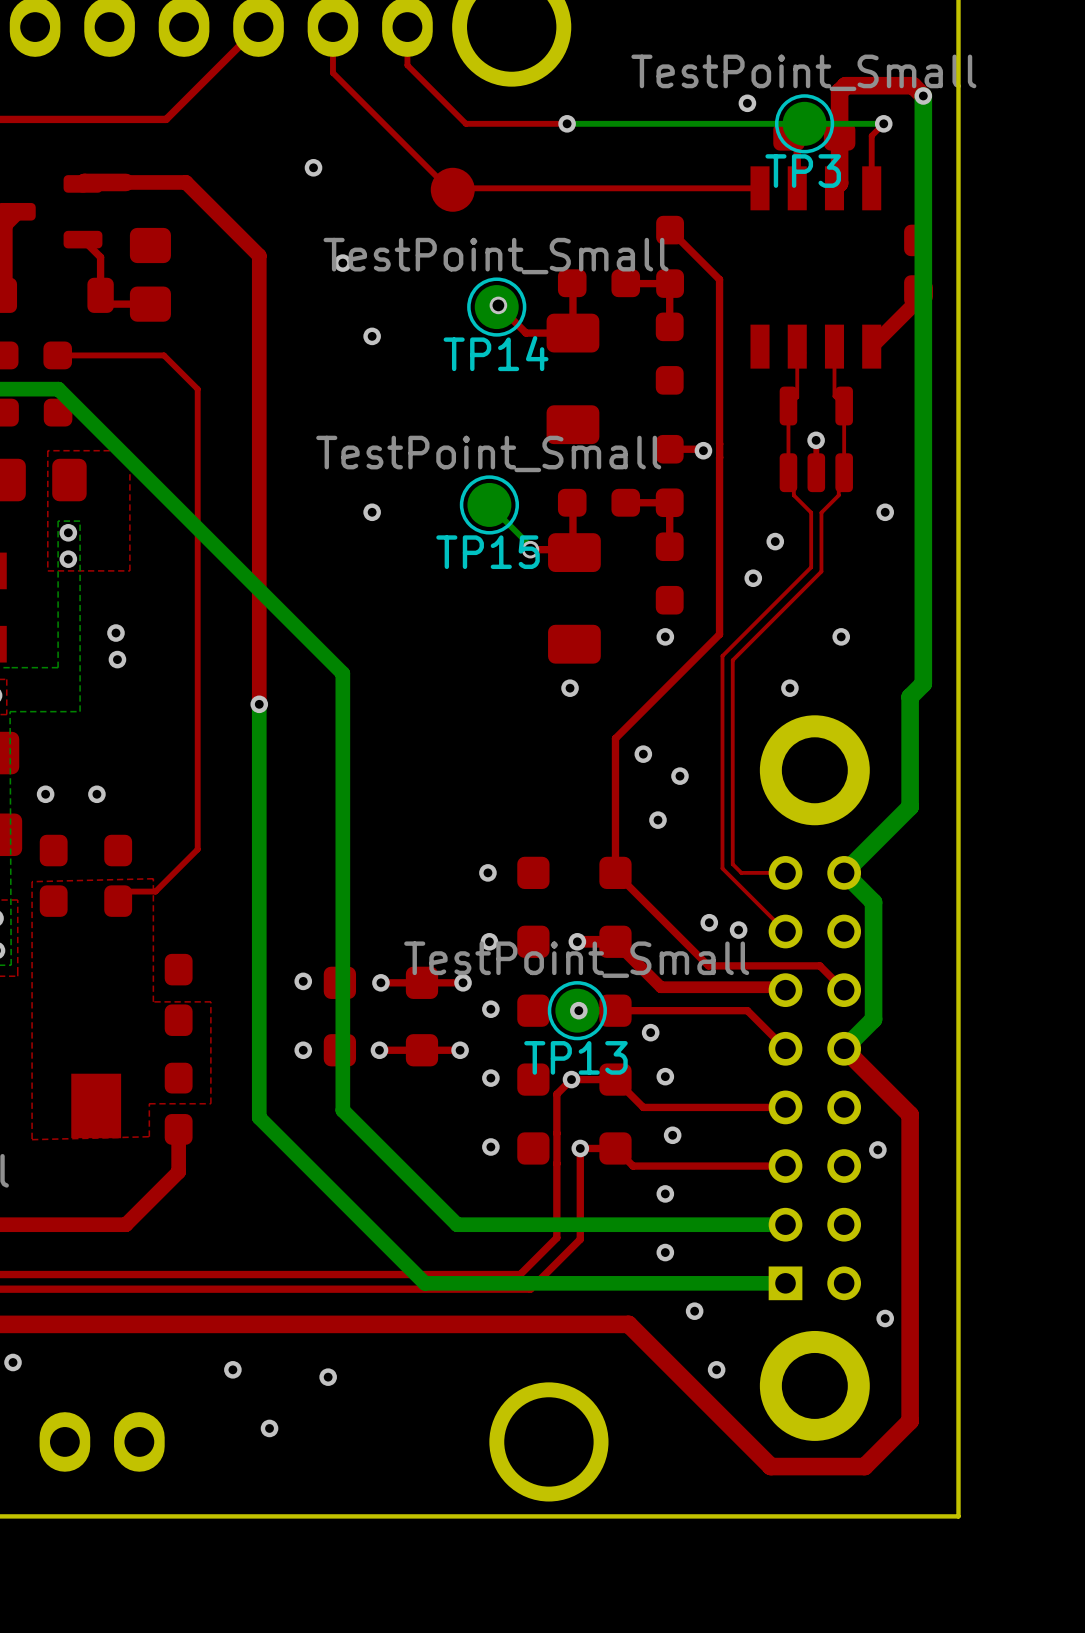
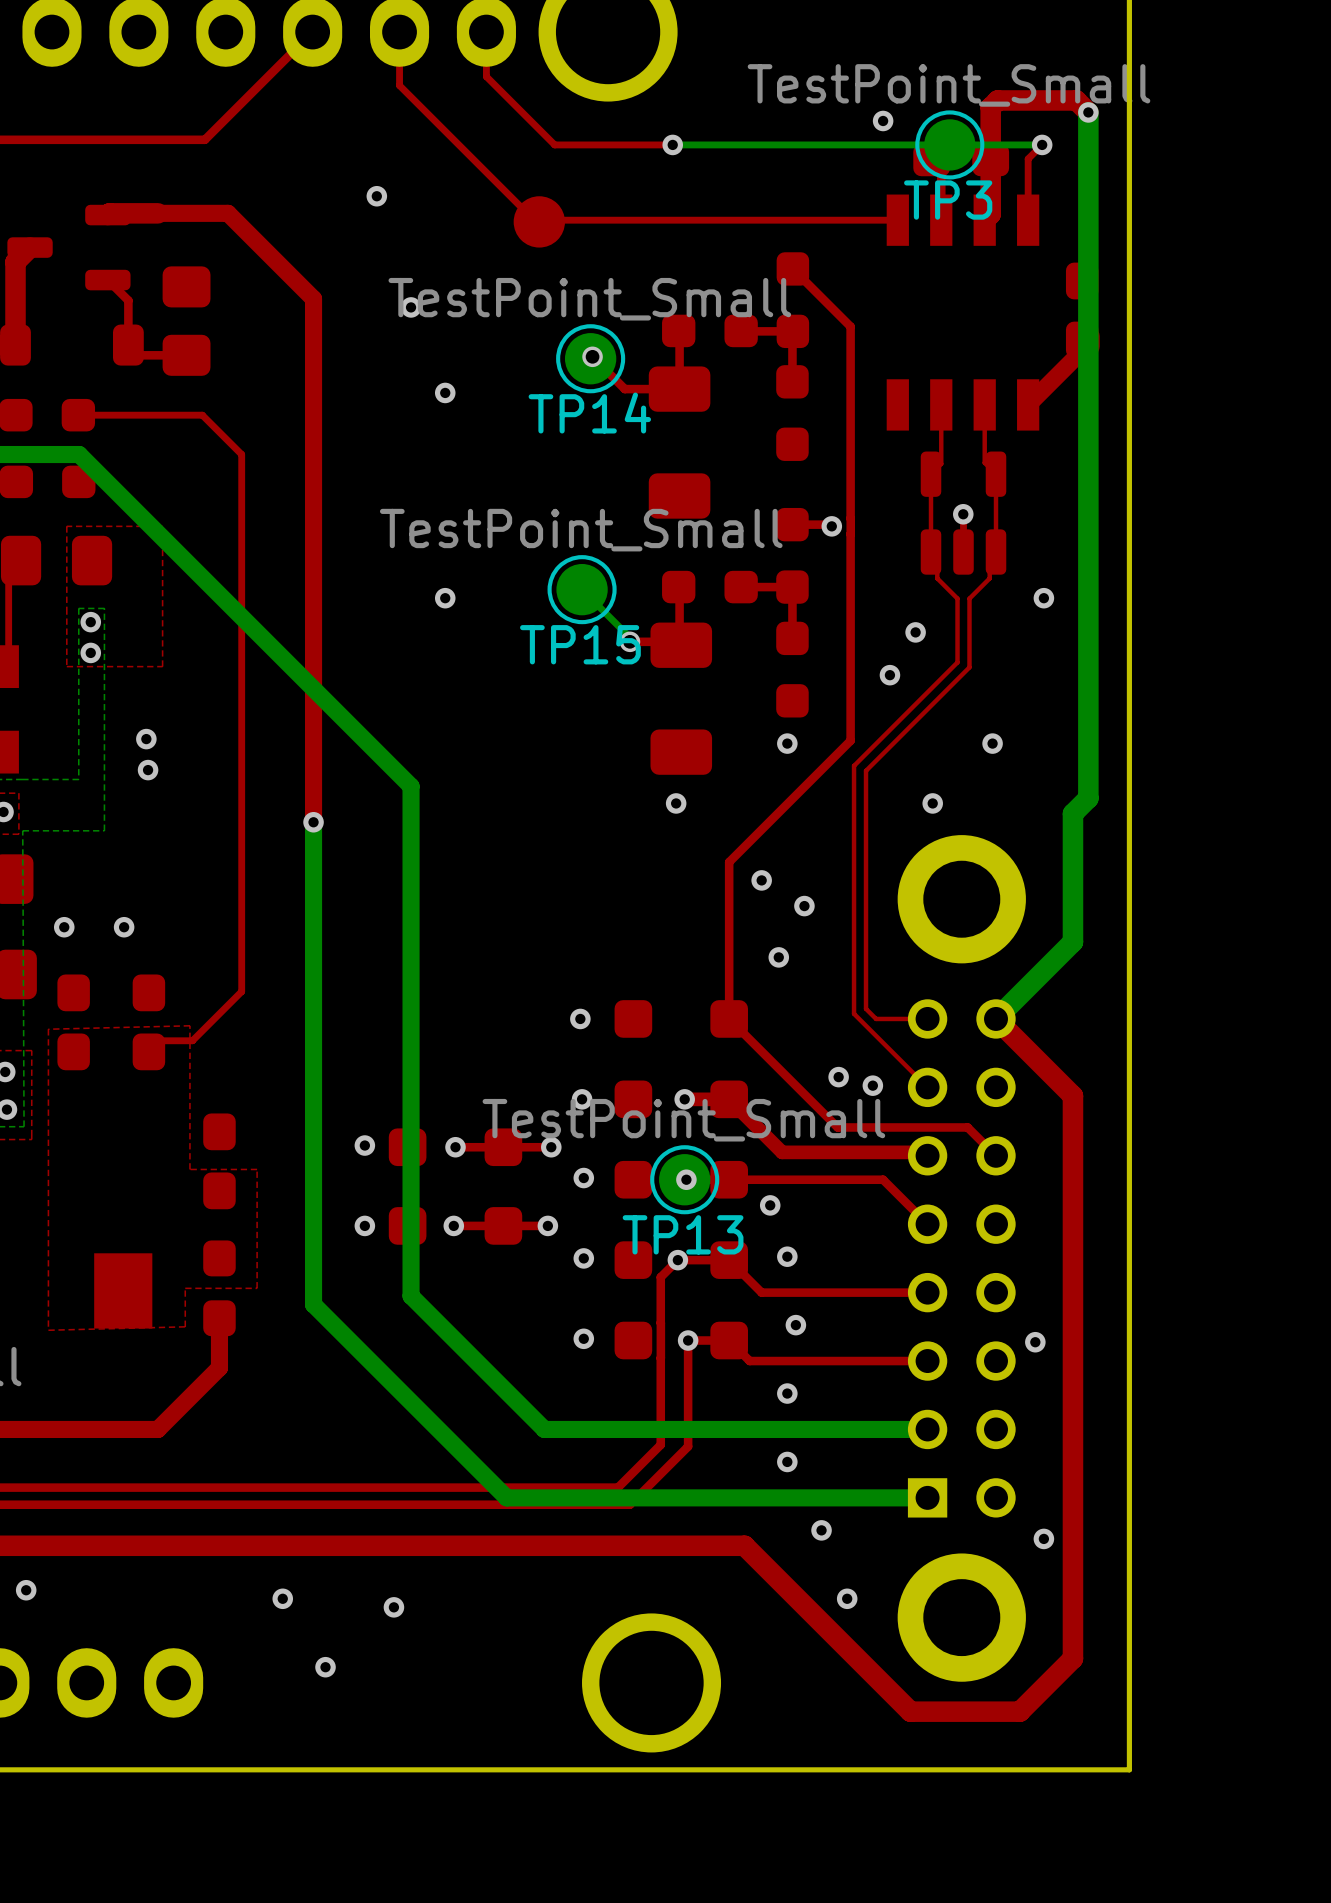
bottom track: (844, 872) (873, 902) (873, 1019) (844, 1048) -> none
top track: (844, 1048) (910, 1114) -> (996, 1018) (1072, 1095) (1072, 1301)

